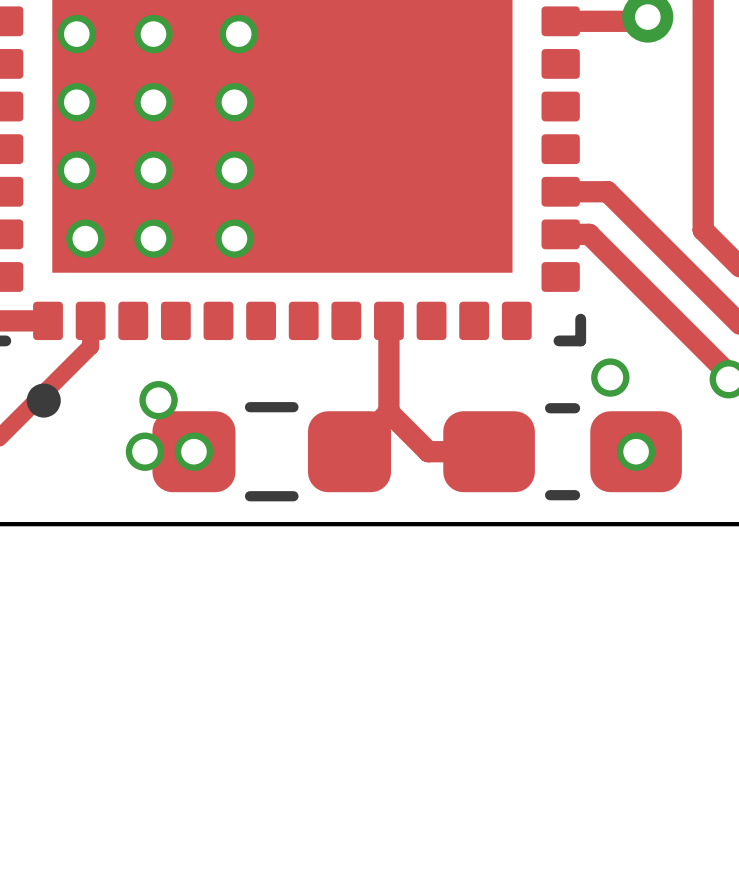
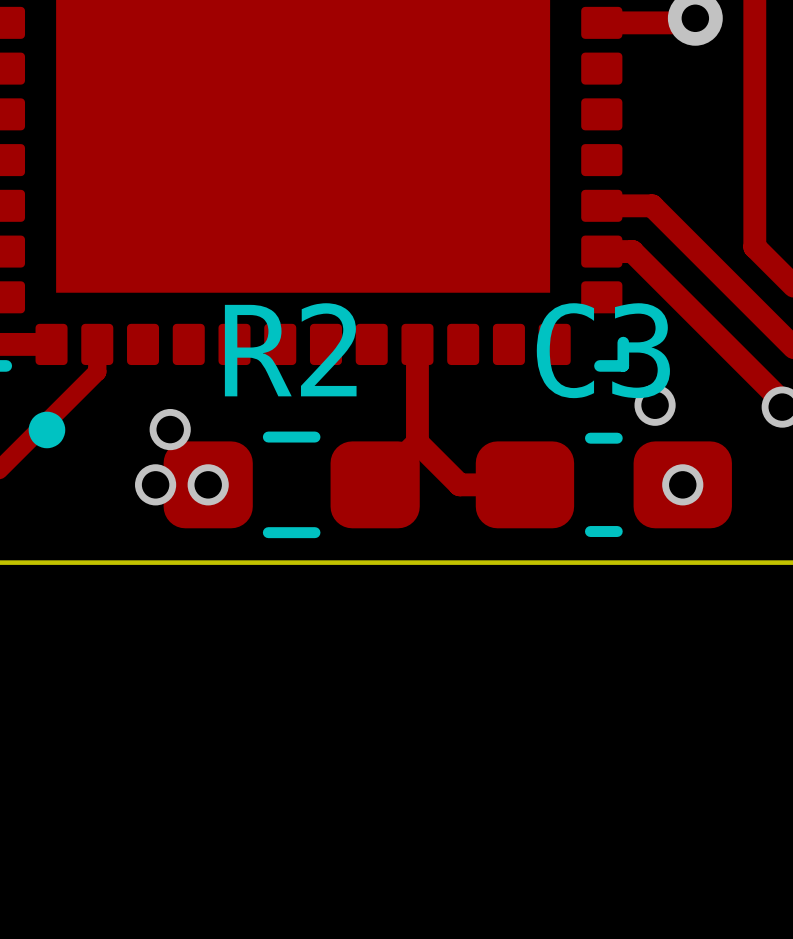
via: (76, 34) -> none
via: (153, 34) -> none
via: (238, 34) -> none
via: (76, 102) -> none
via: (153, 102) -> none
via: (234, 102) -> none
via: (76, 170) -> none
via: (153, 170) -> none
via: (234, 170) -> none
via: (85, 238) -> none
via: (153, 238) -> none
via: (234, 238) -> none
R2 name: none -> R2 (290, 349)
C3 name: none -> C3 (603, 350)

